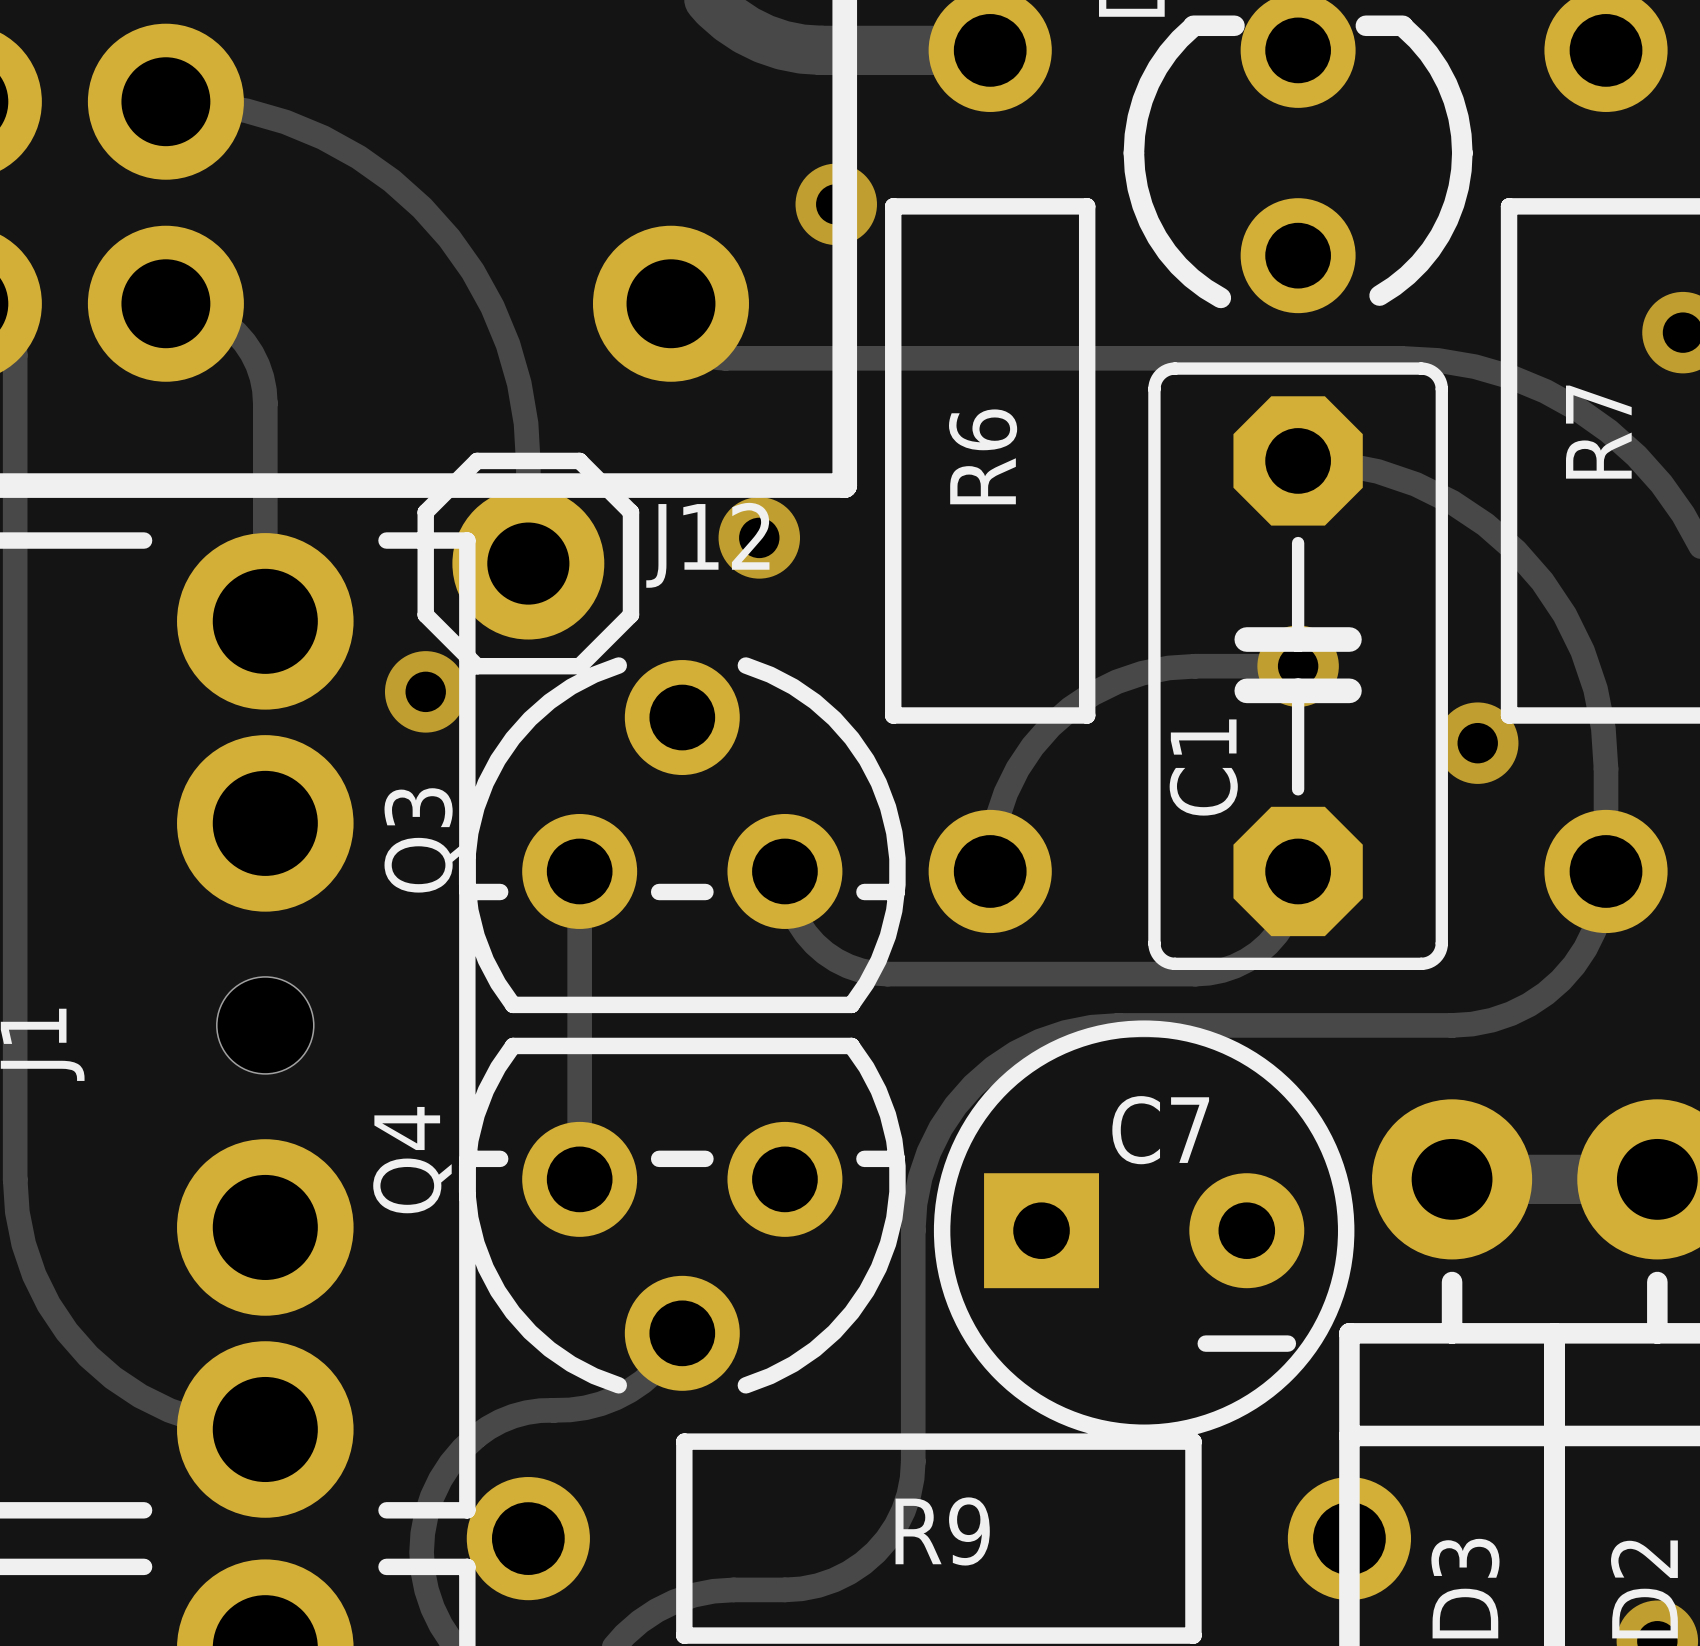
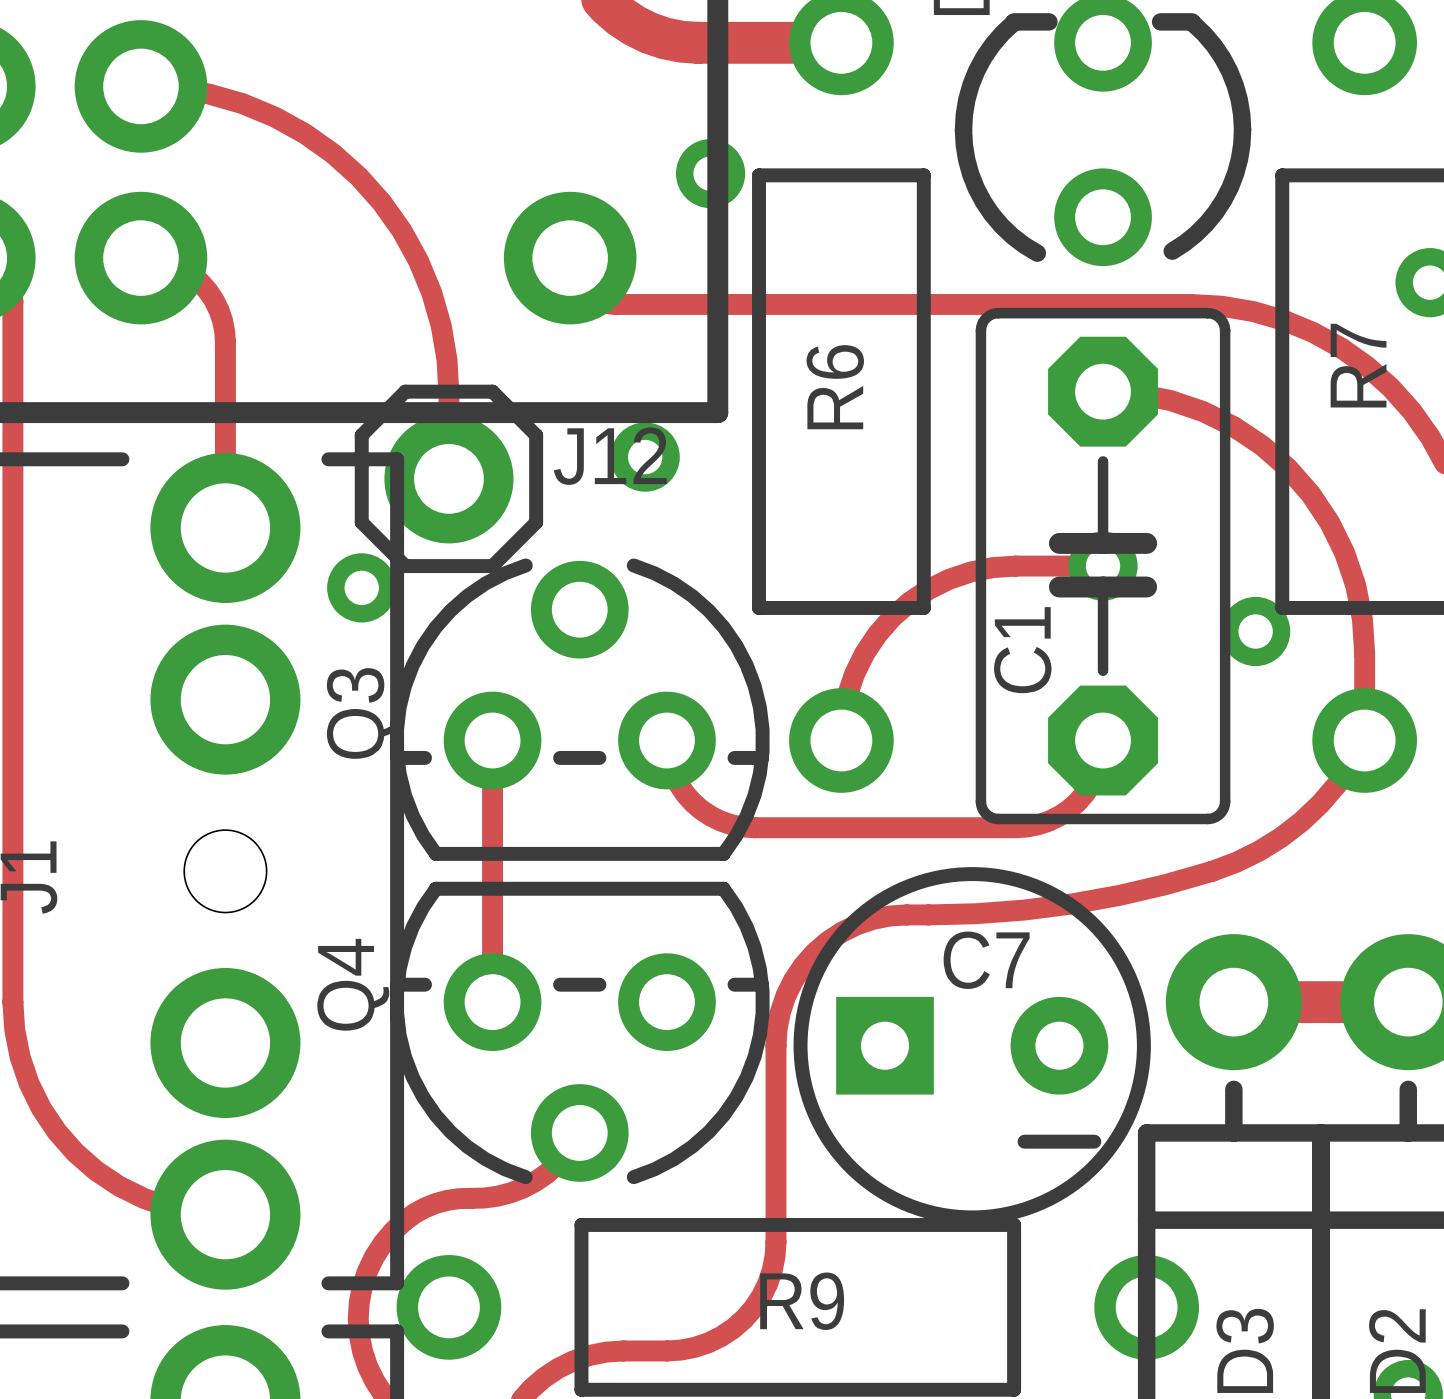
track: (1606, 871) (1600, 911) (1585, 948) (1574, 965) (1545, 993) (1529, 1004) (1491, 1020) (1452, 1025) (1118, 1025) (1091, 1027) (1065, 1032) (1039, 1041) (1015, 1052) (993, 1067) (973, 1085) (955, 1105) (940, 1128) (928, 1152) (920, 1177) (914, 1203) (913, 1230) -> (1364, 740) (1337, 784) (1301, 821) (1259, 850) (1212, 871) (1119, 895) (1071, 903) (976, 913) (889, 916) (872, 919) (841, 932) (814, 953) (793, 980) (780, 1011) (775, 1045)

